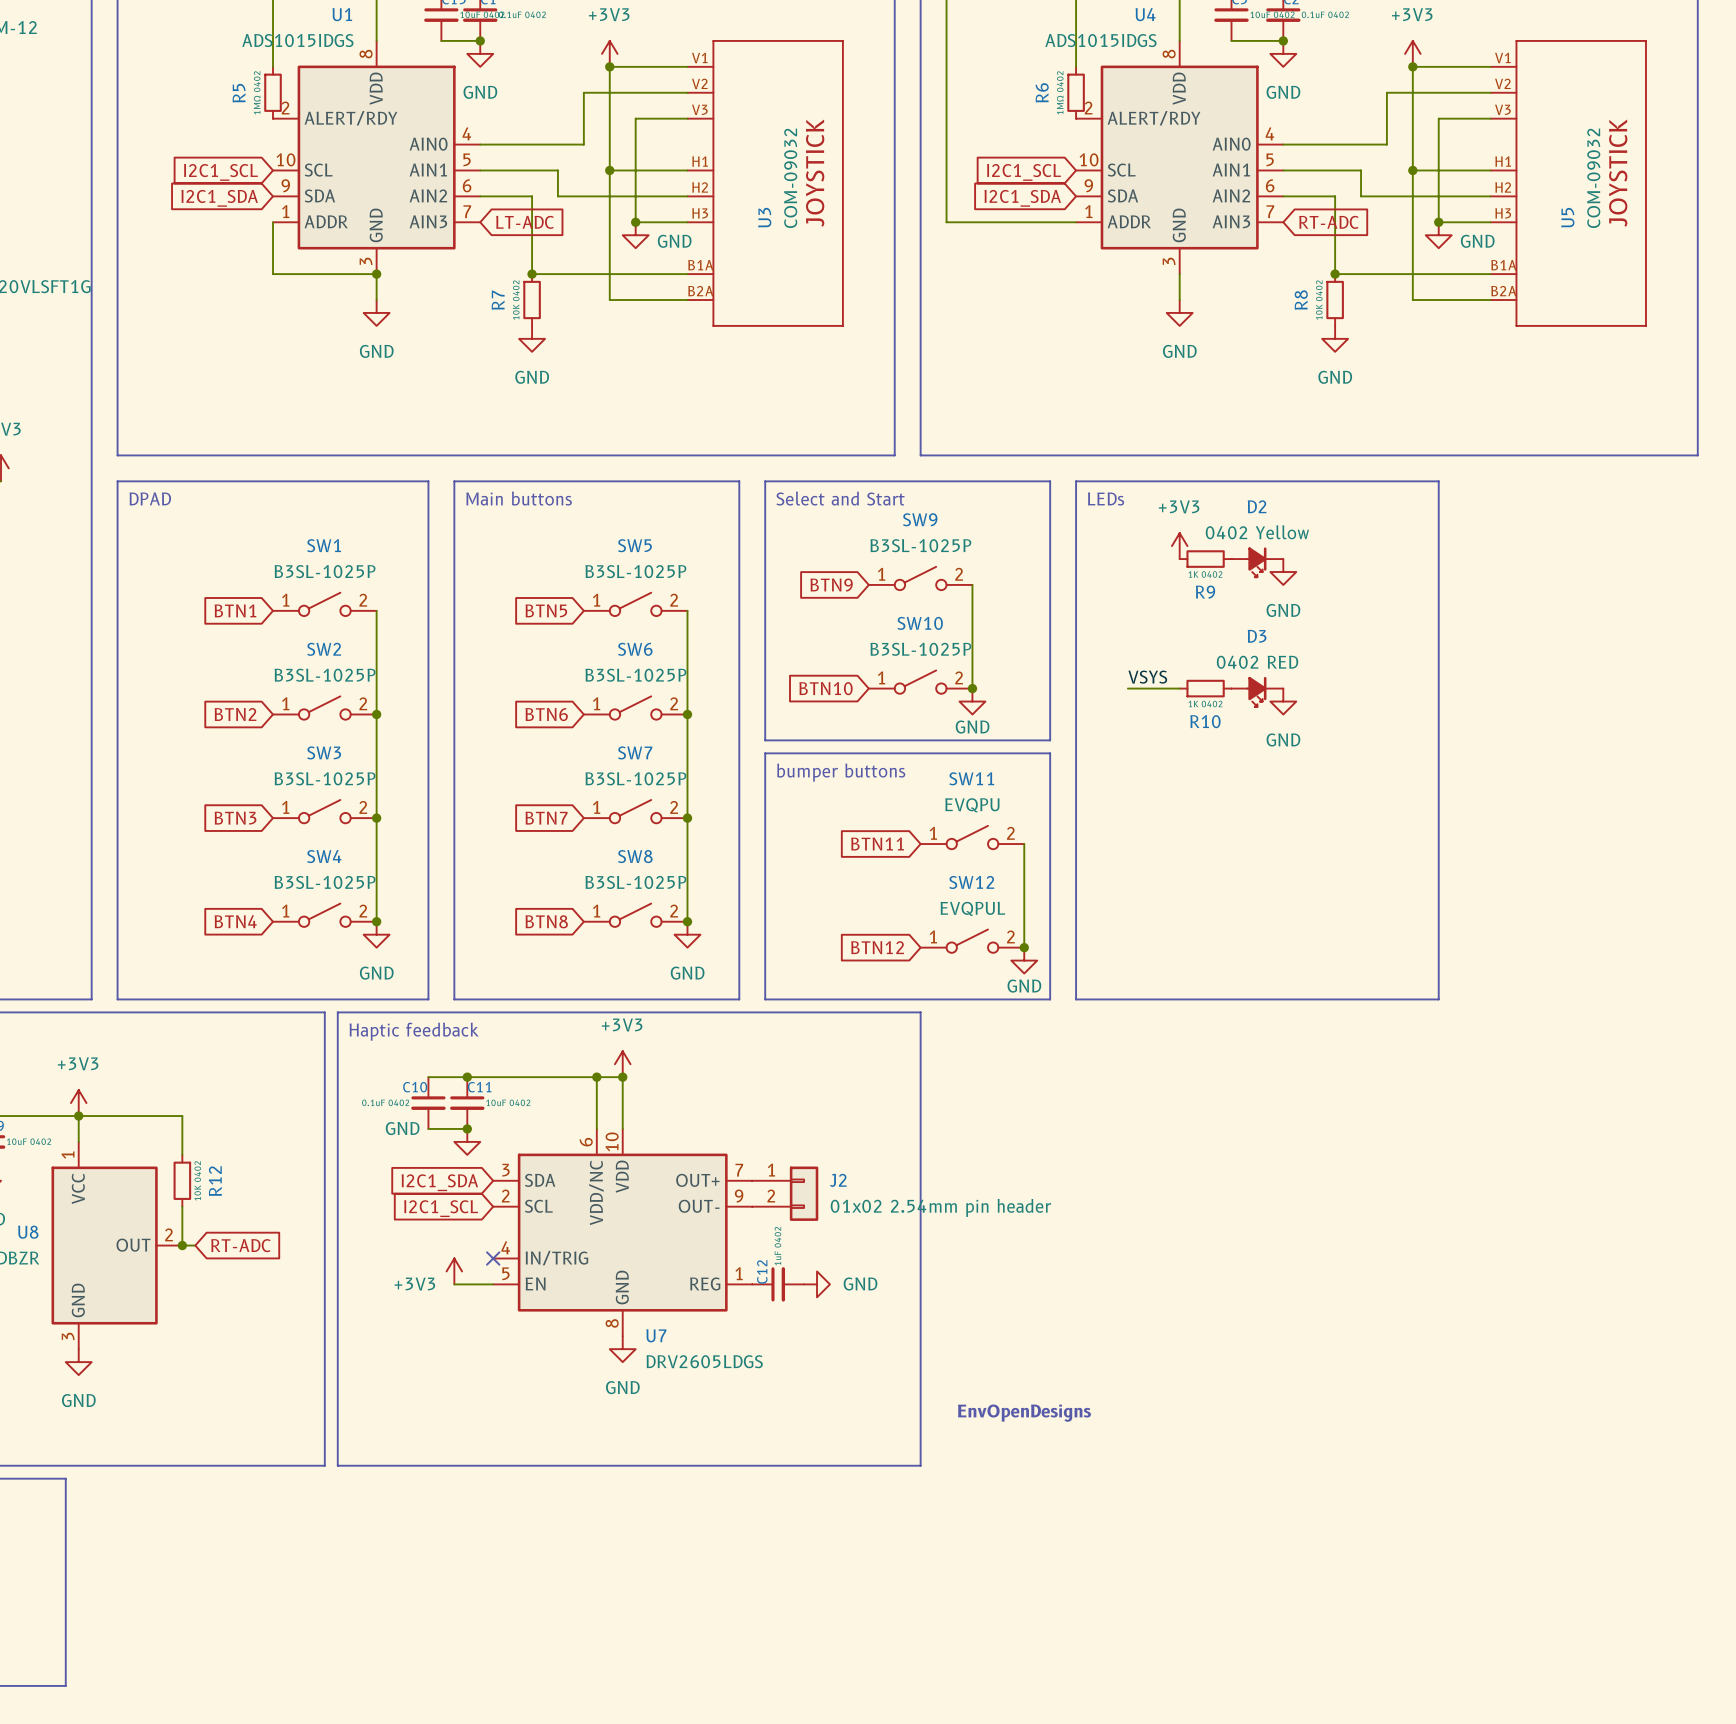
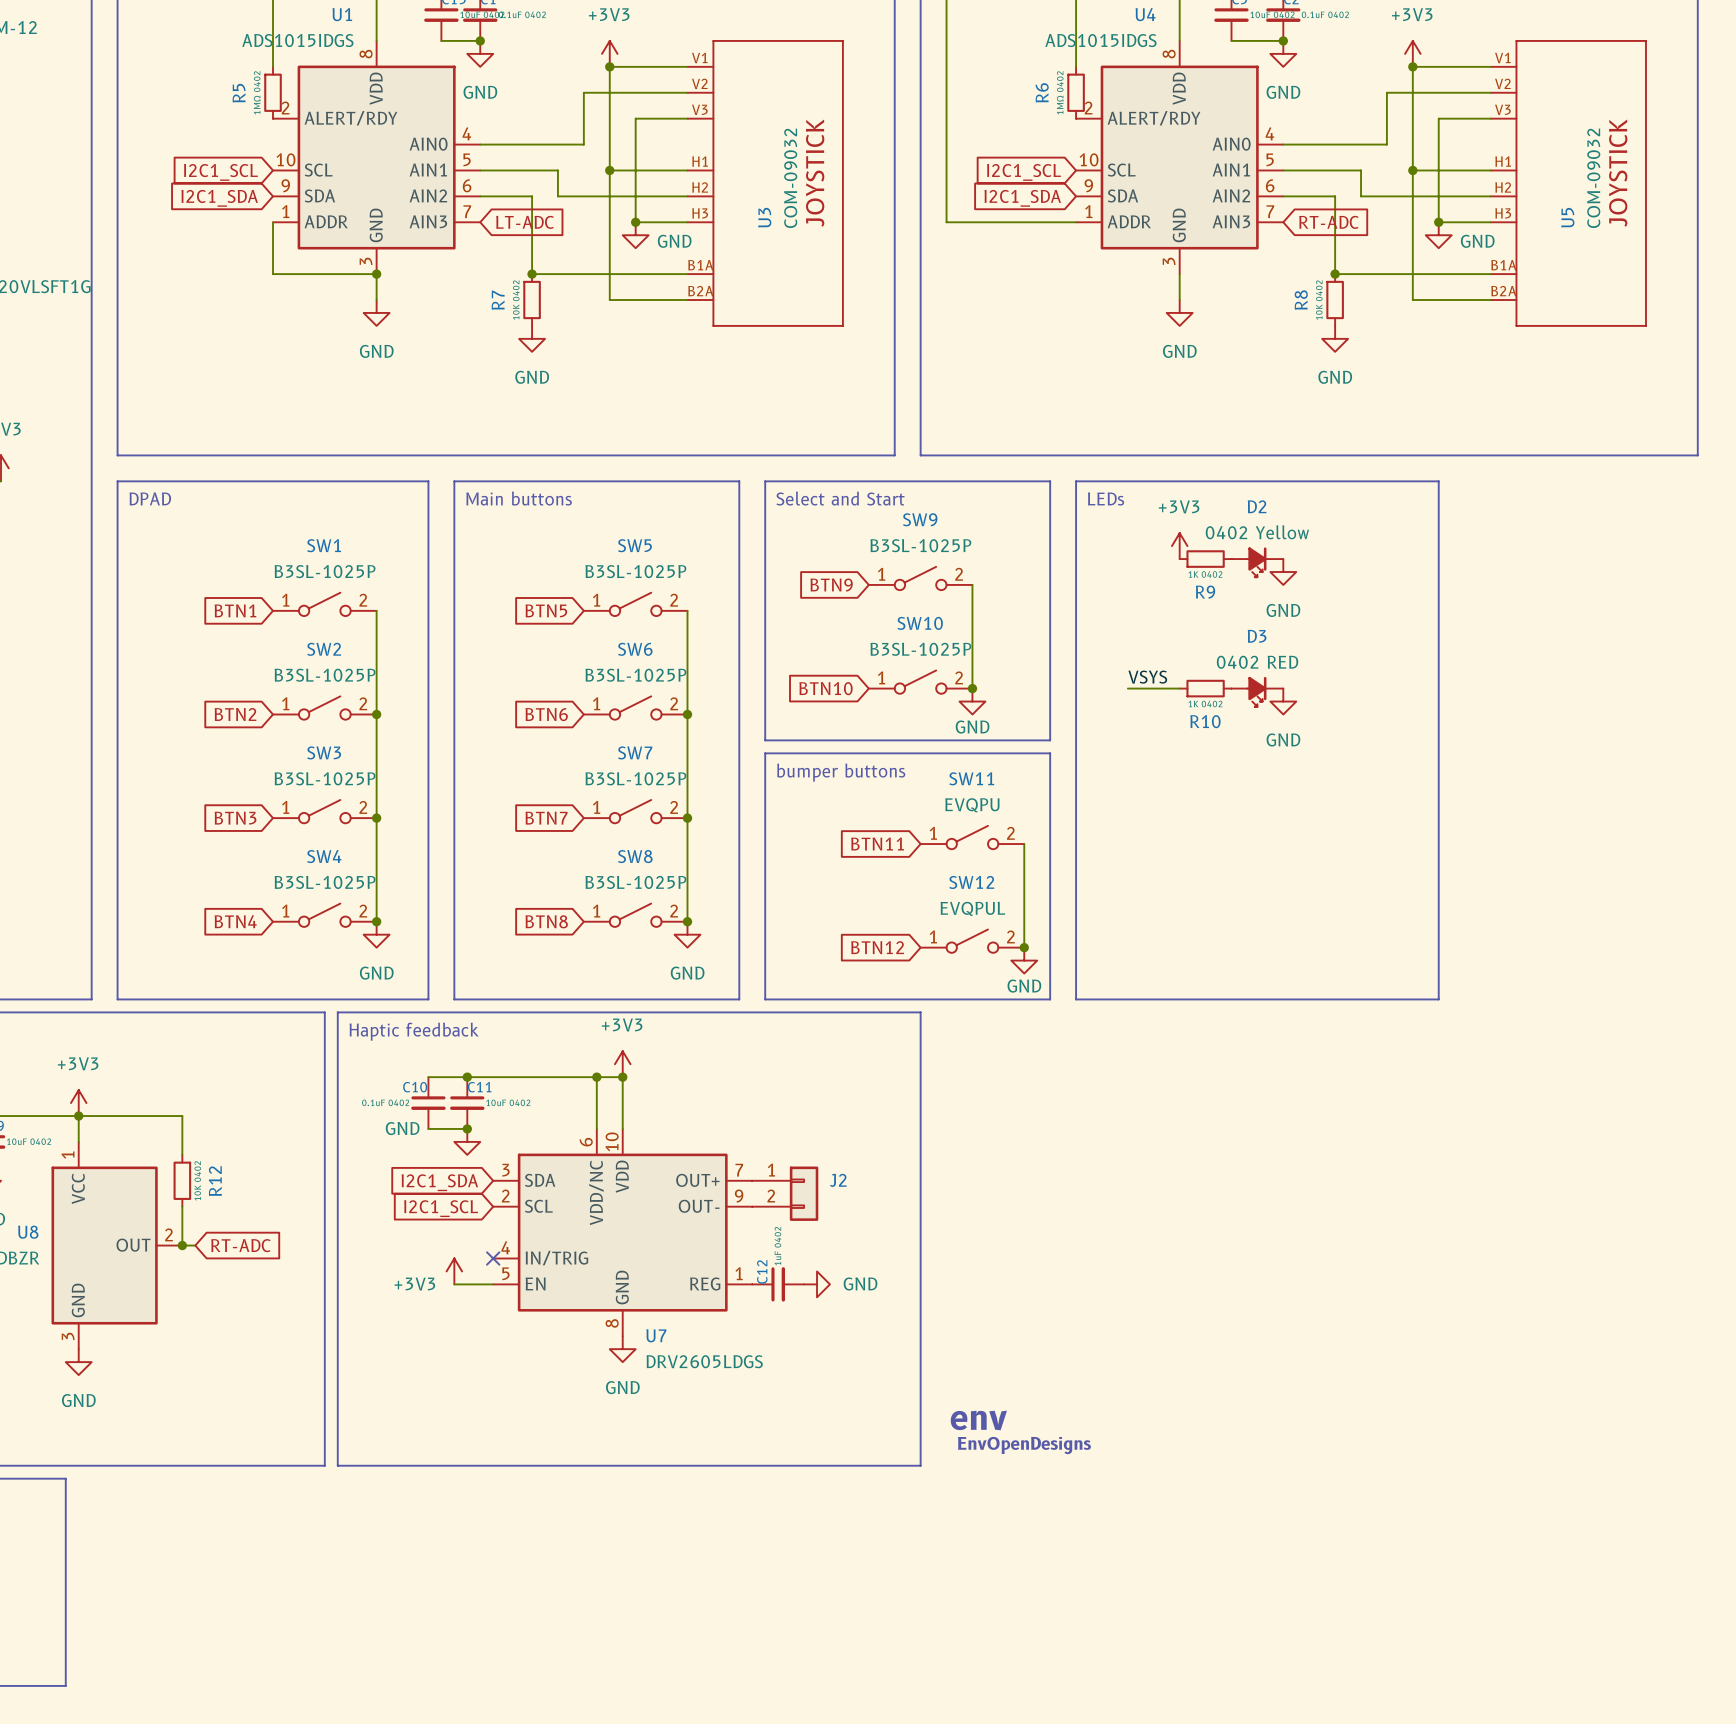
J2 value: 01x02 2.54mm pin header (940, 1207) -> none
text position: EnvOpenDesigns (1024, 1413) -> EnvOpenDesigns (1024, 1445)
text: none -> env (978, 1420)

